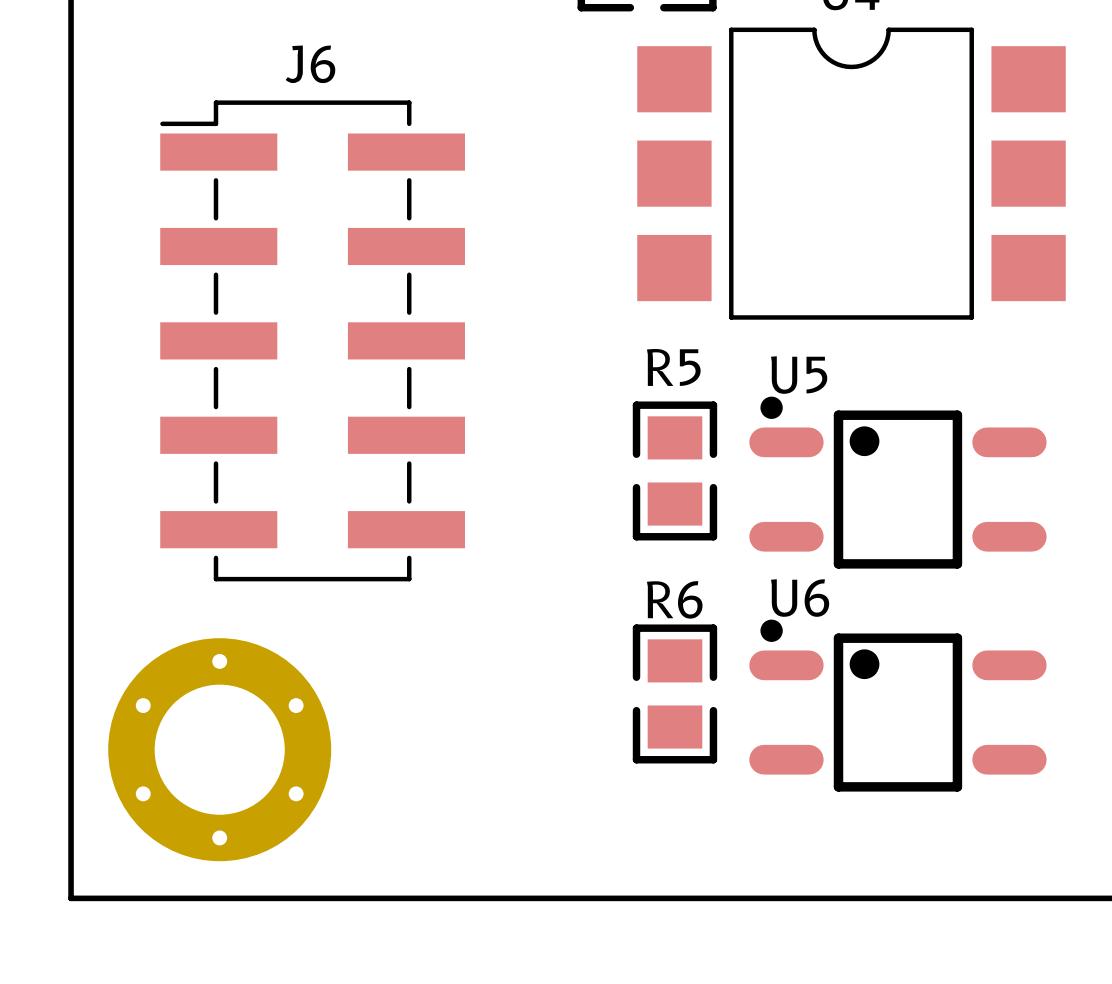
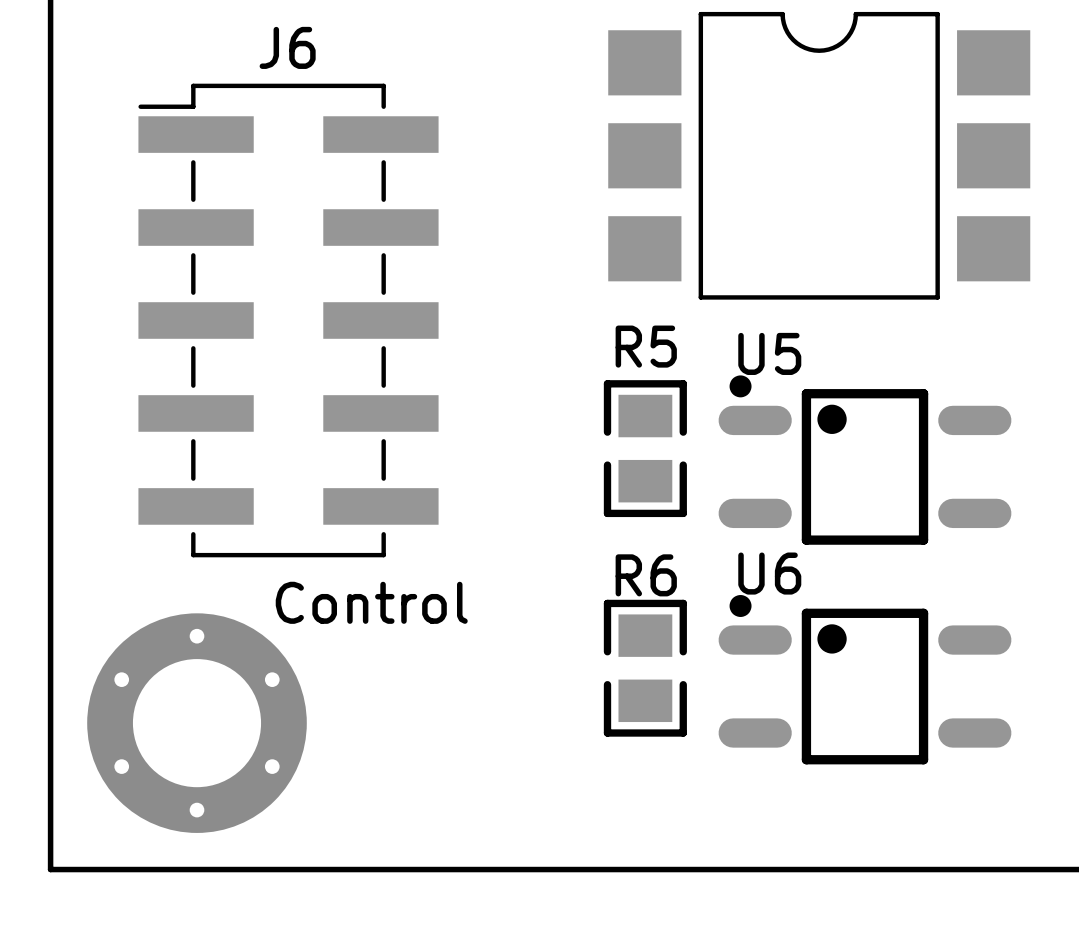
text: none -> Control (371, 602)

